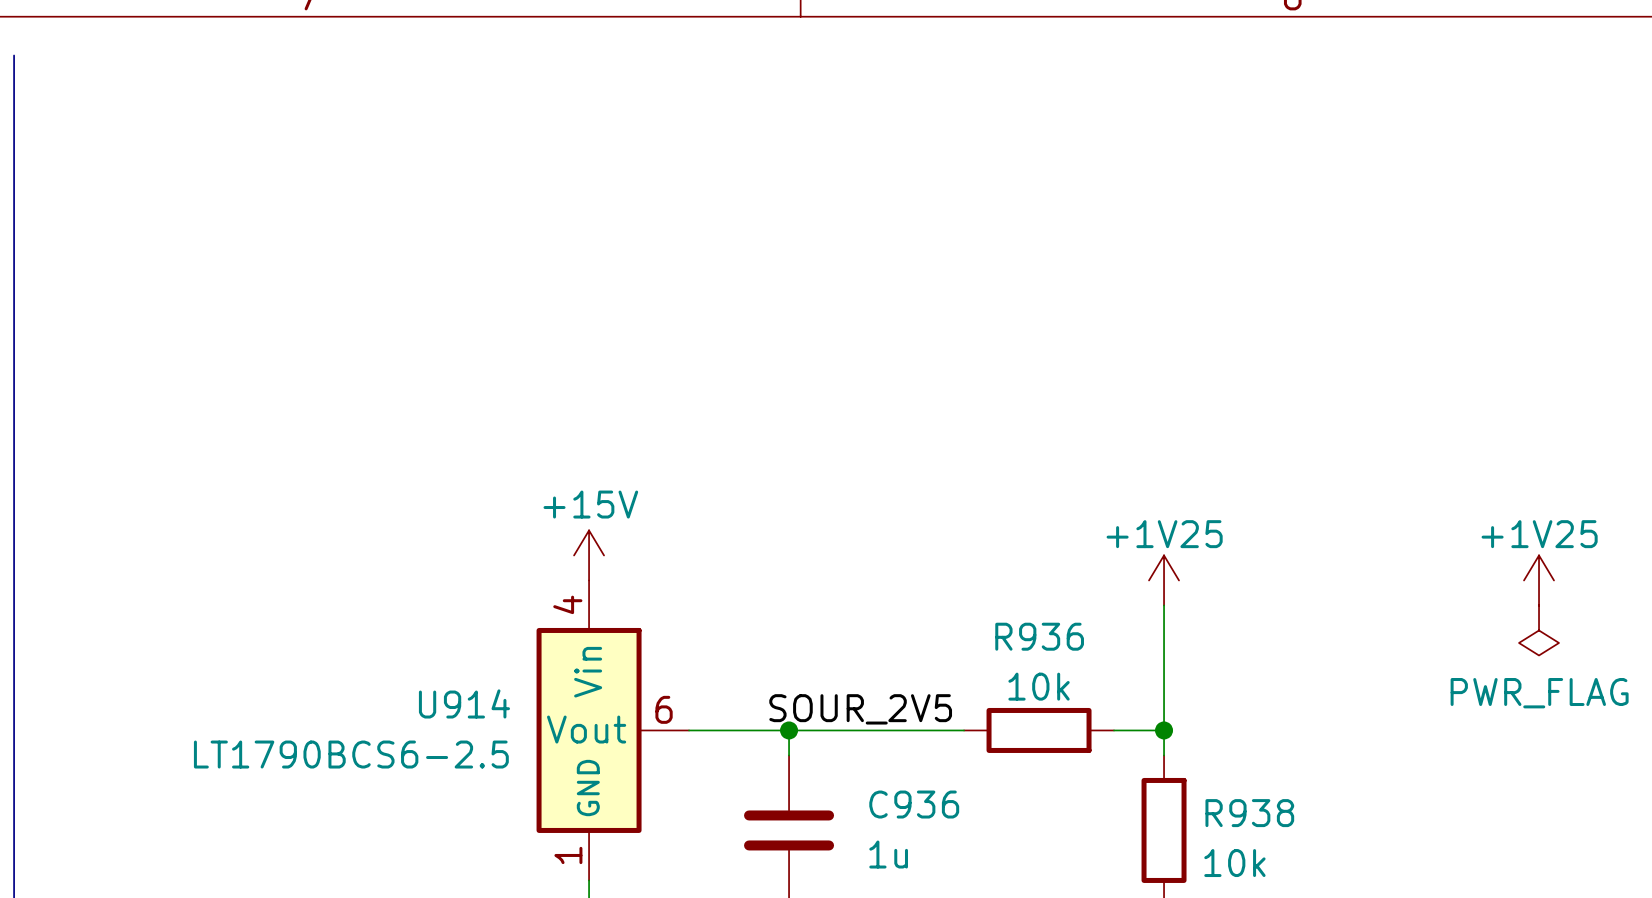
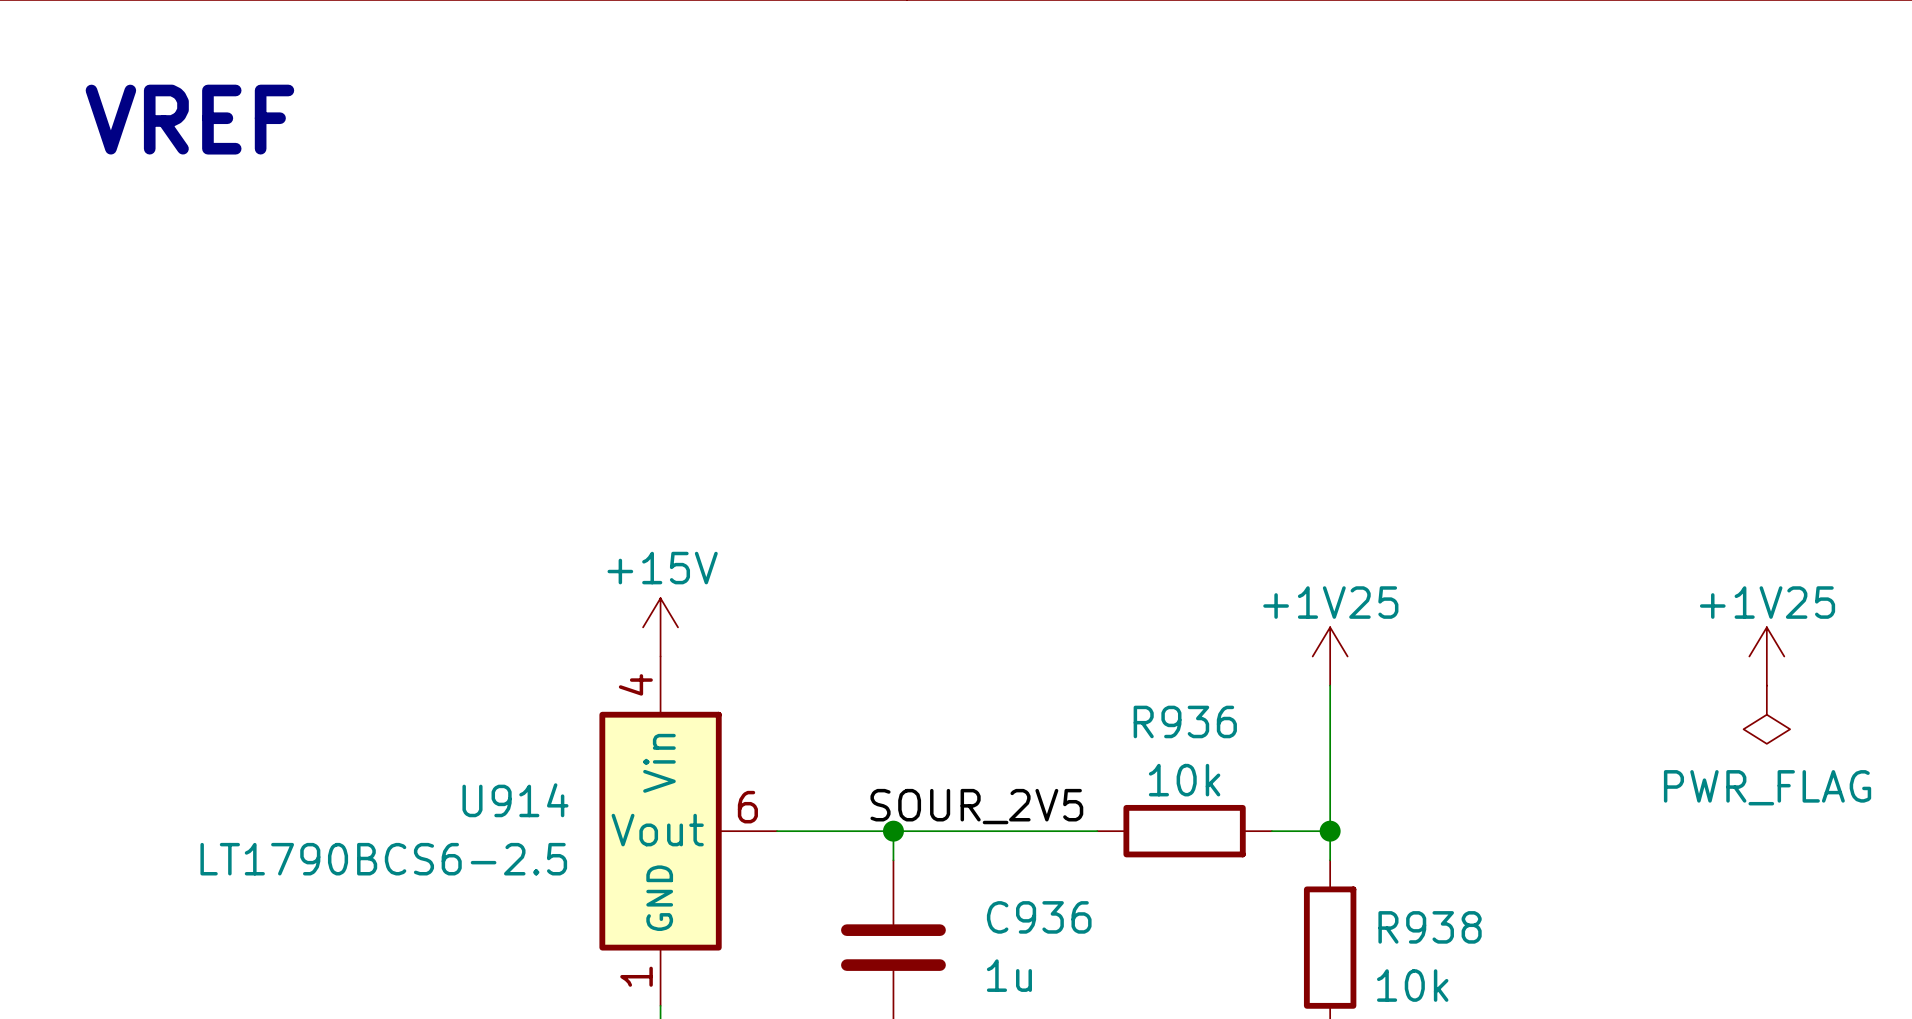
text: none -> VREF (189, 119)

